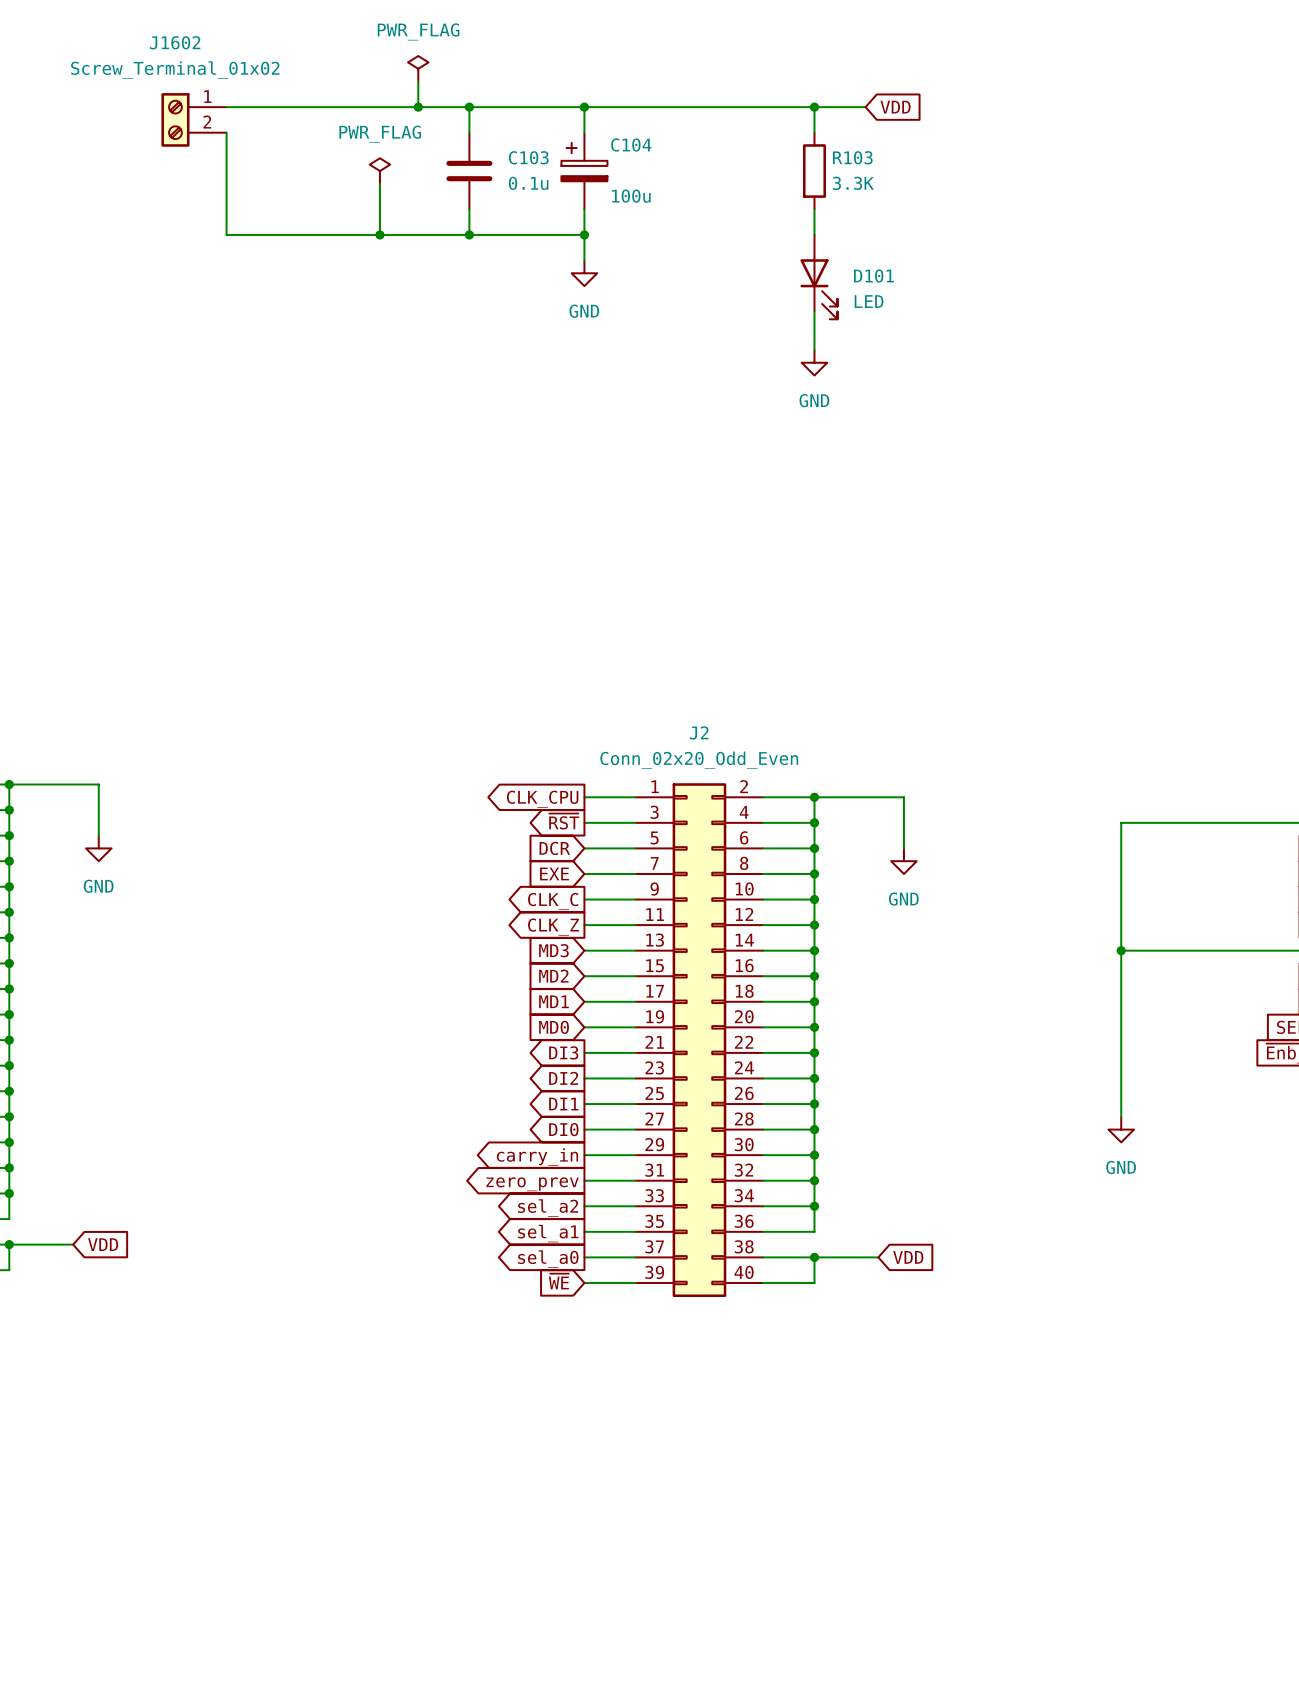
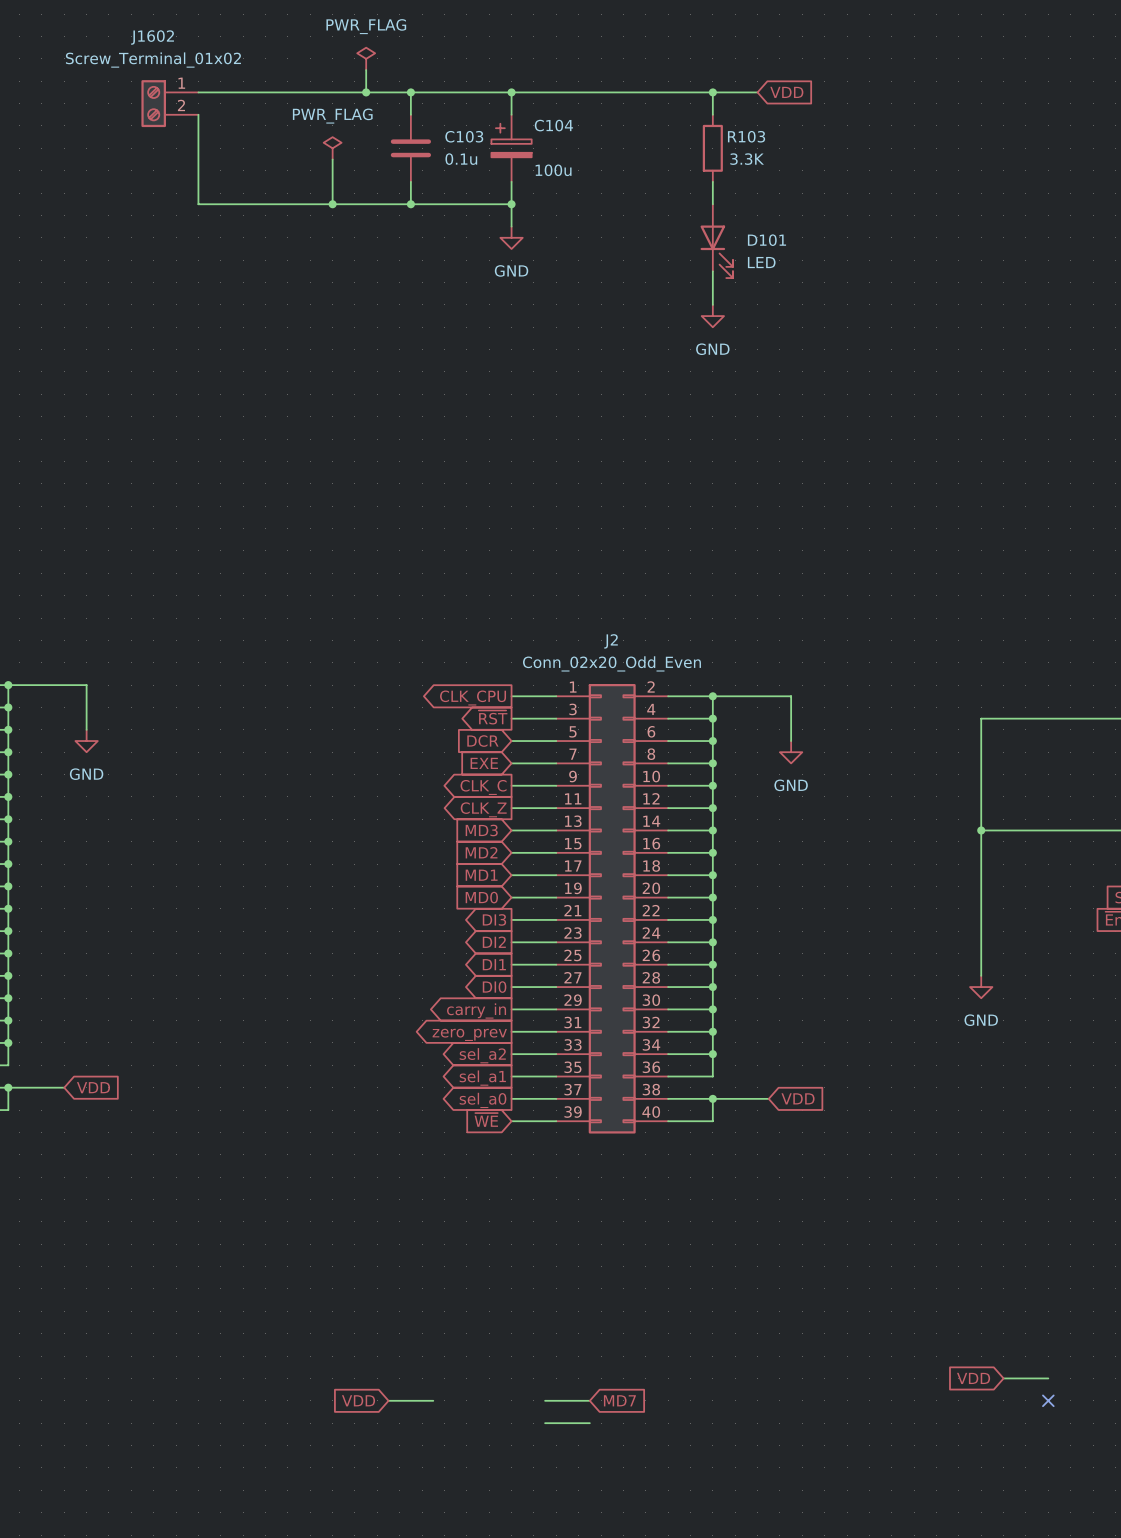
global label: none -> VDD (973, 1378)
wire: none -> (1003, 1378) (1048, 1378)
global label: none -> VDD (358, 1400)
wire: none -> (388, 1400) (433, 1400)
wire: none -> (545, 1400) (589, 1400)
global label: none -> MD7 (619, 1400)
no-connect mark: none -> (1048, 1400)
wire: none -> (545, 1423) (589, 1423)

